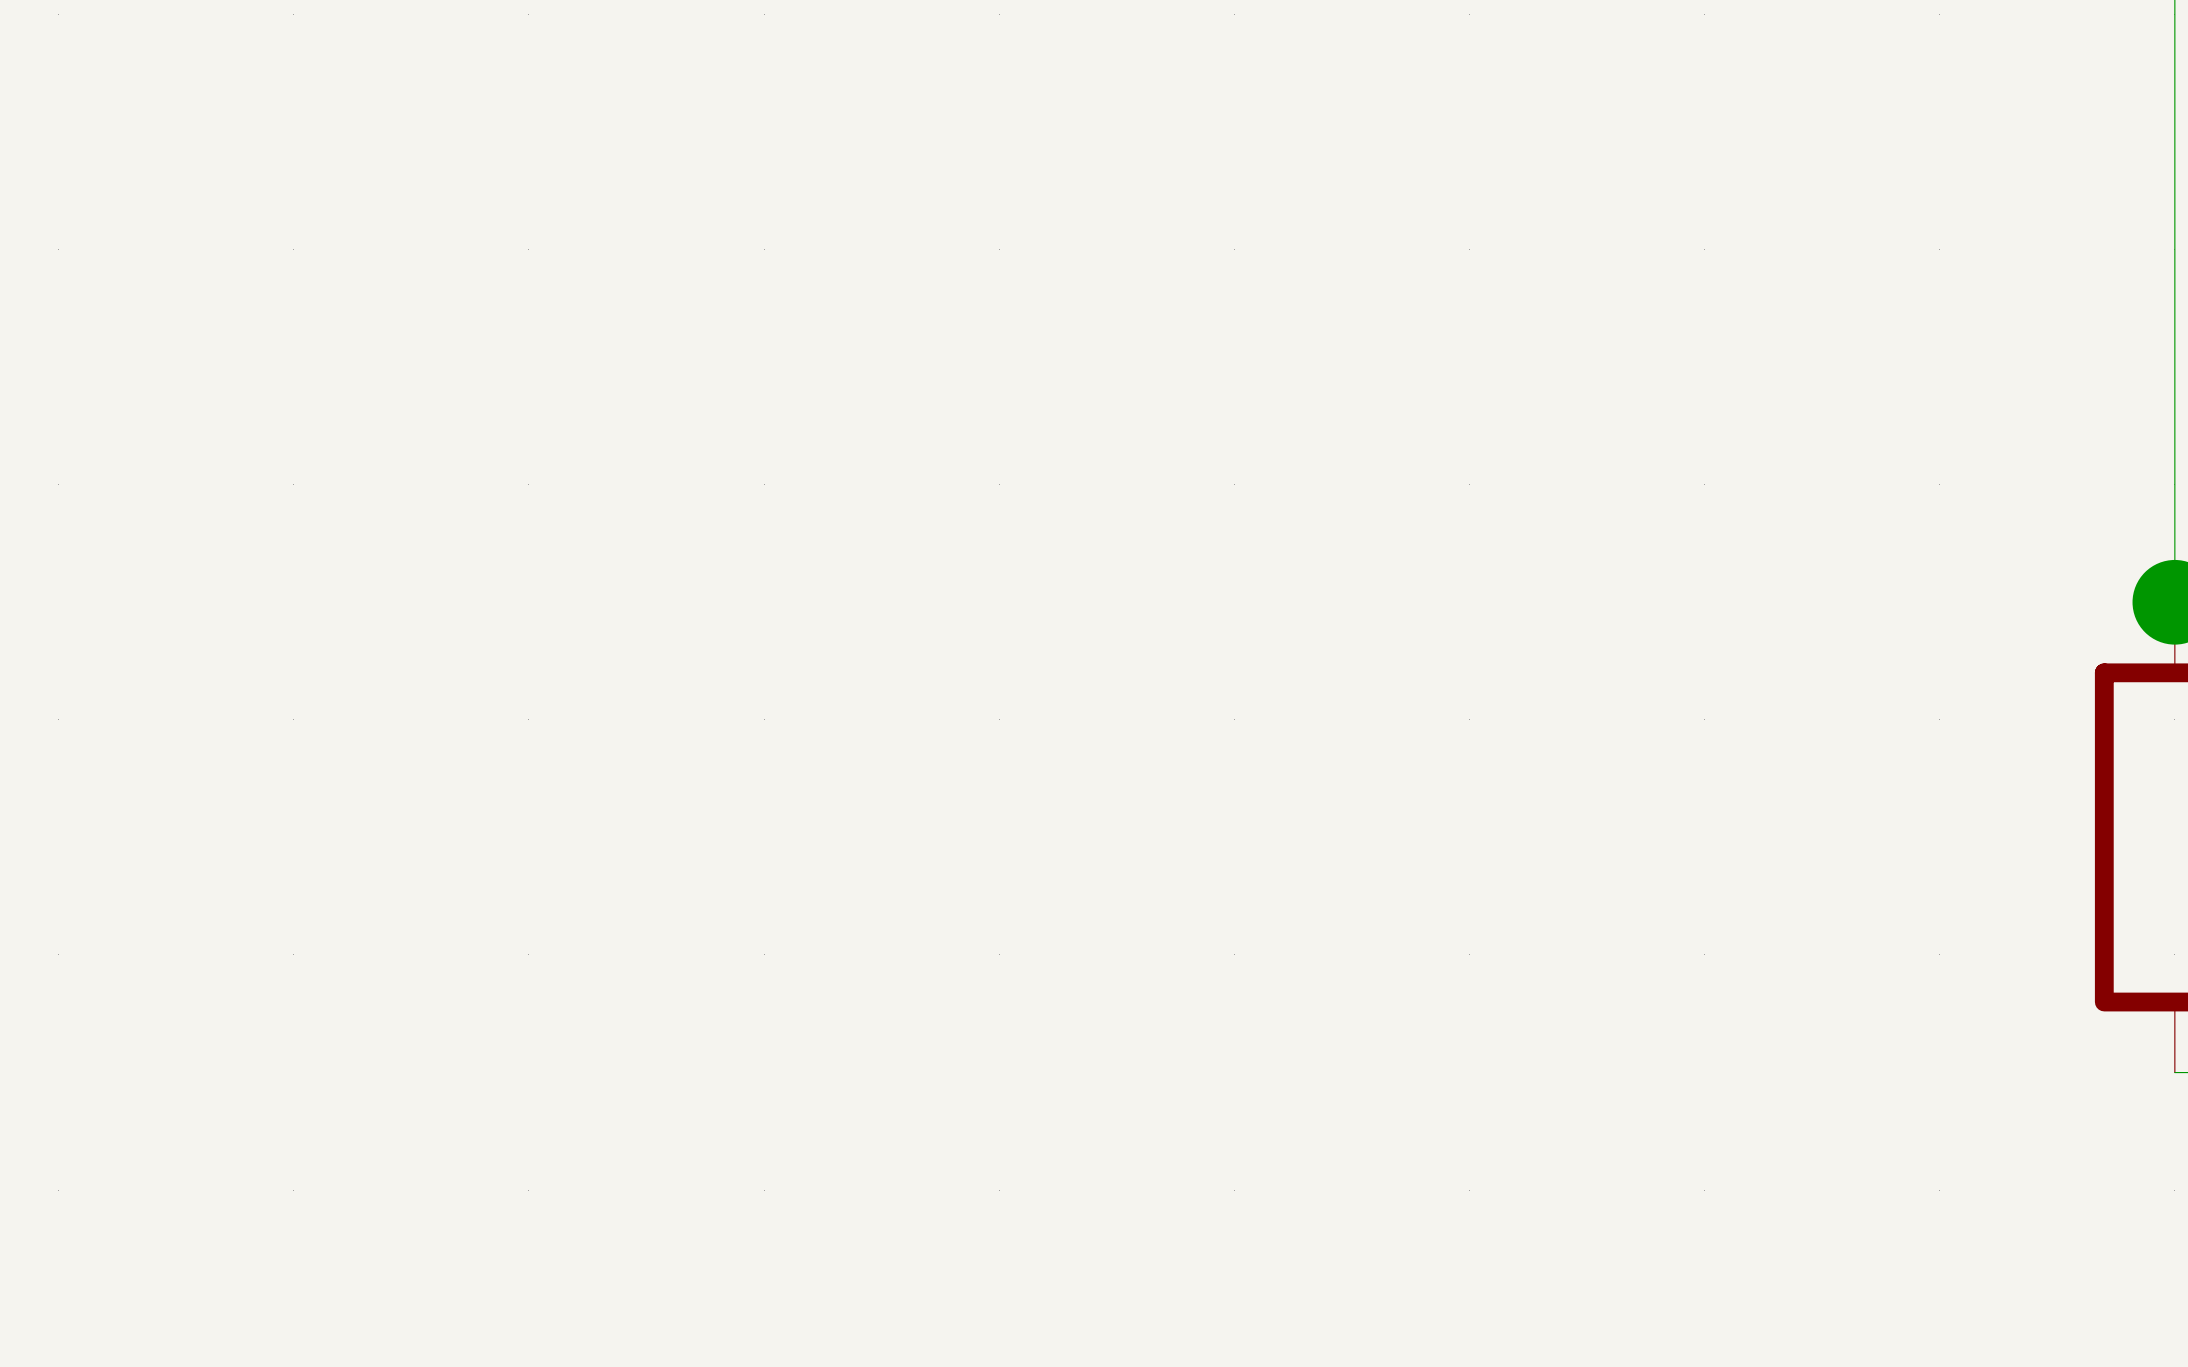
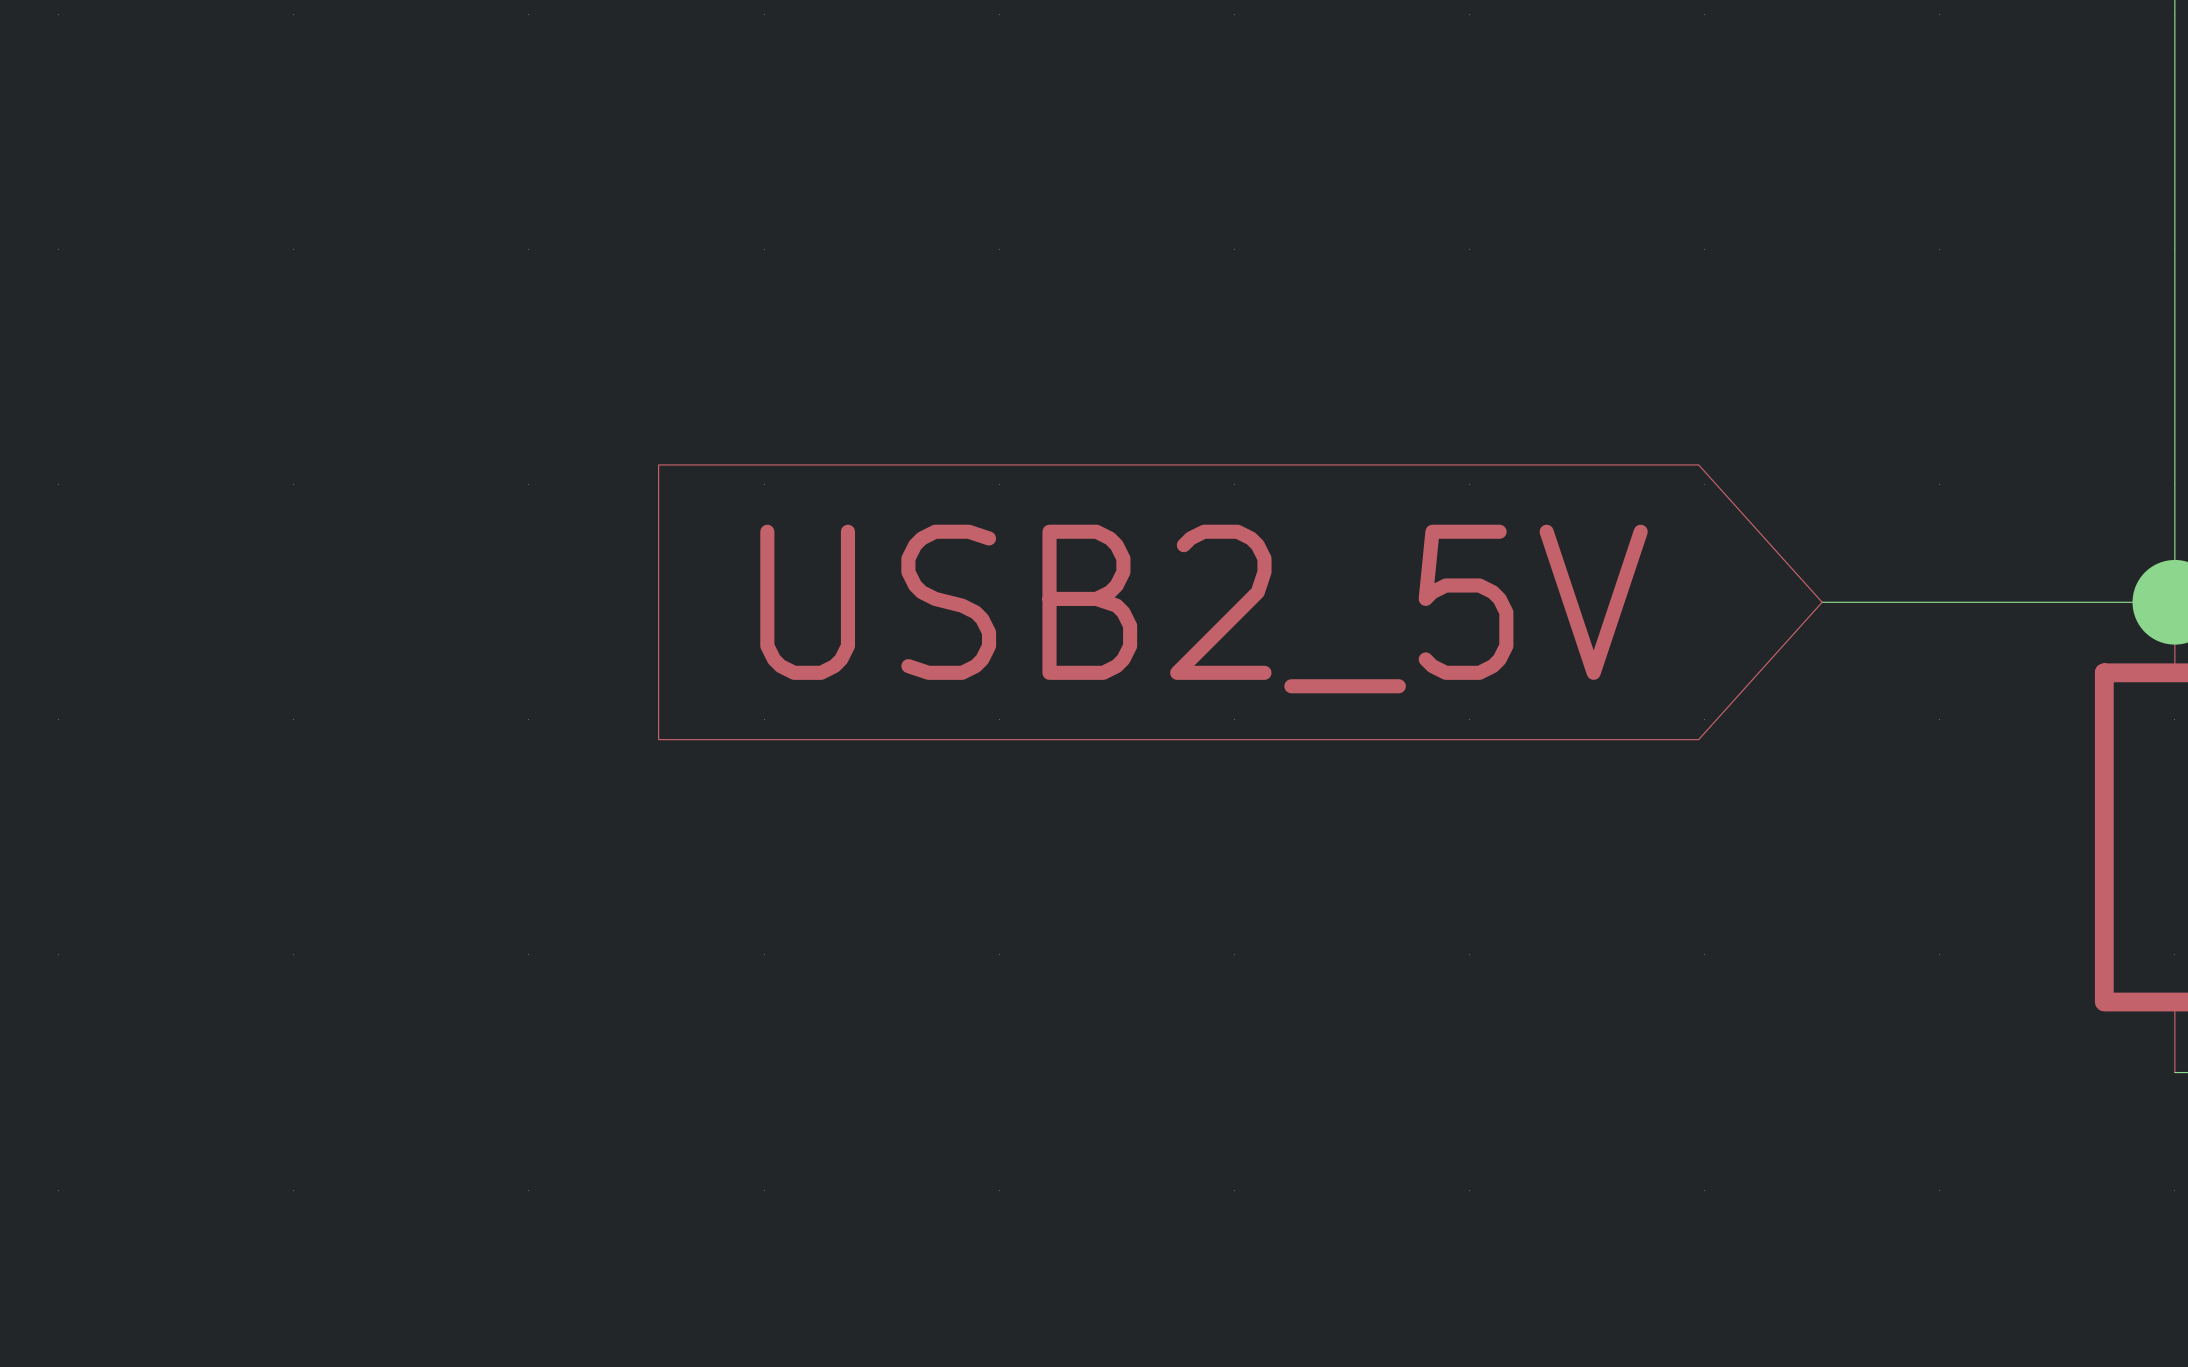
wire: none -> (1822, 602) (2174, 602)
global label: none -> USB2_5V (1204, 609)

